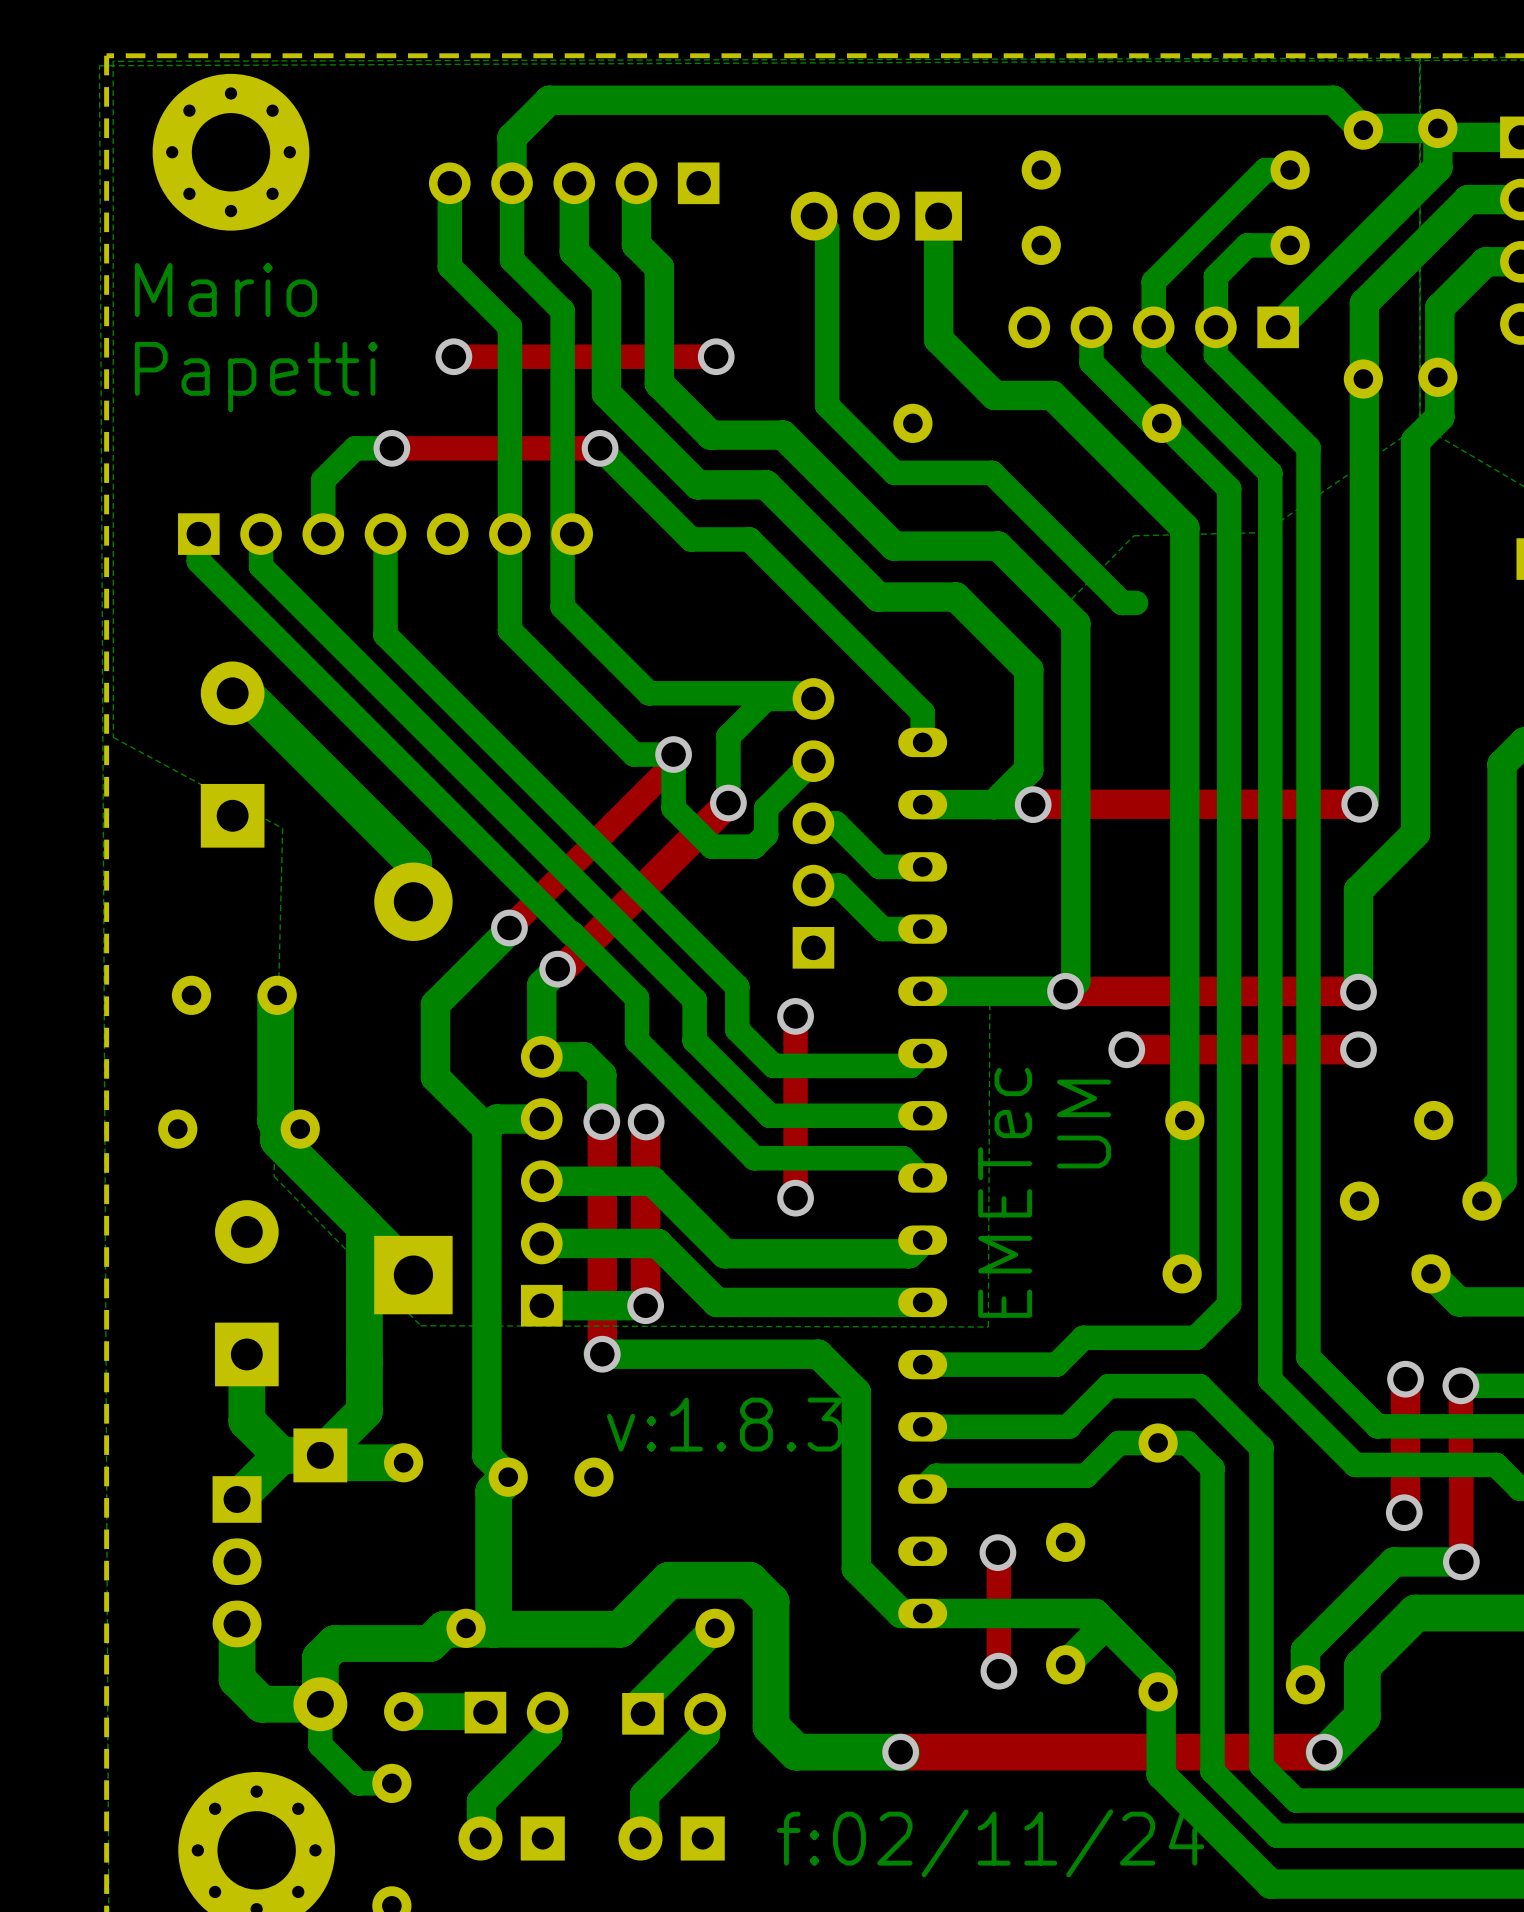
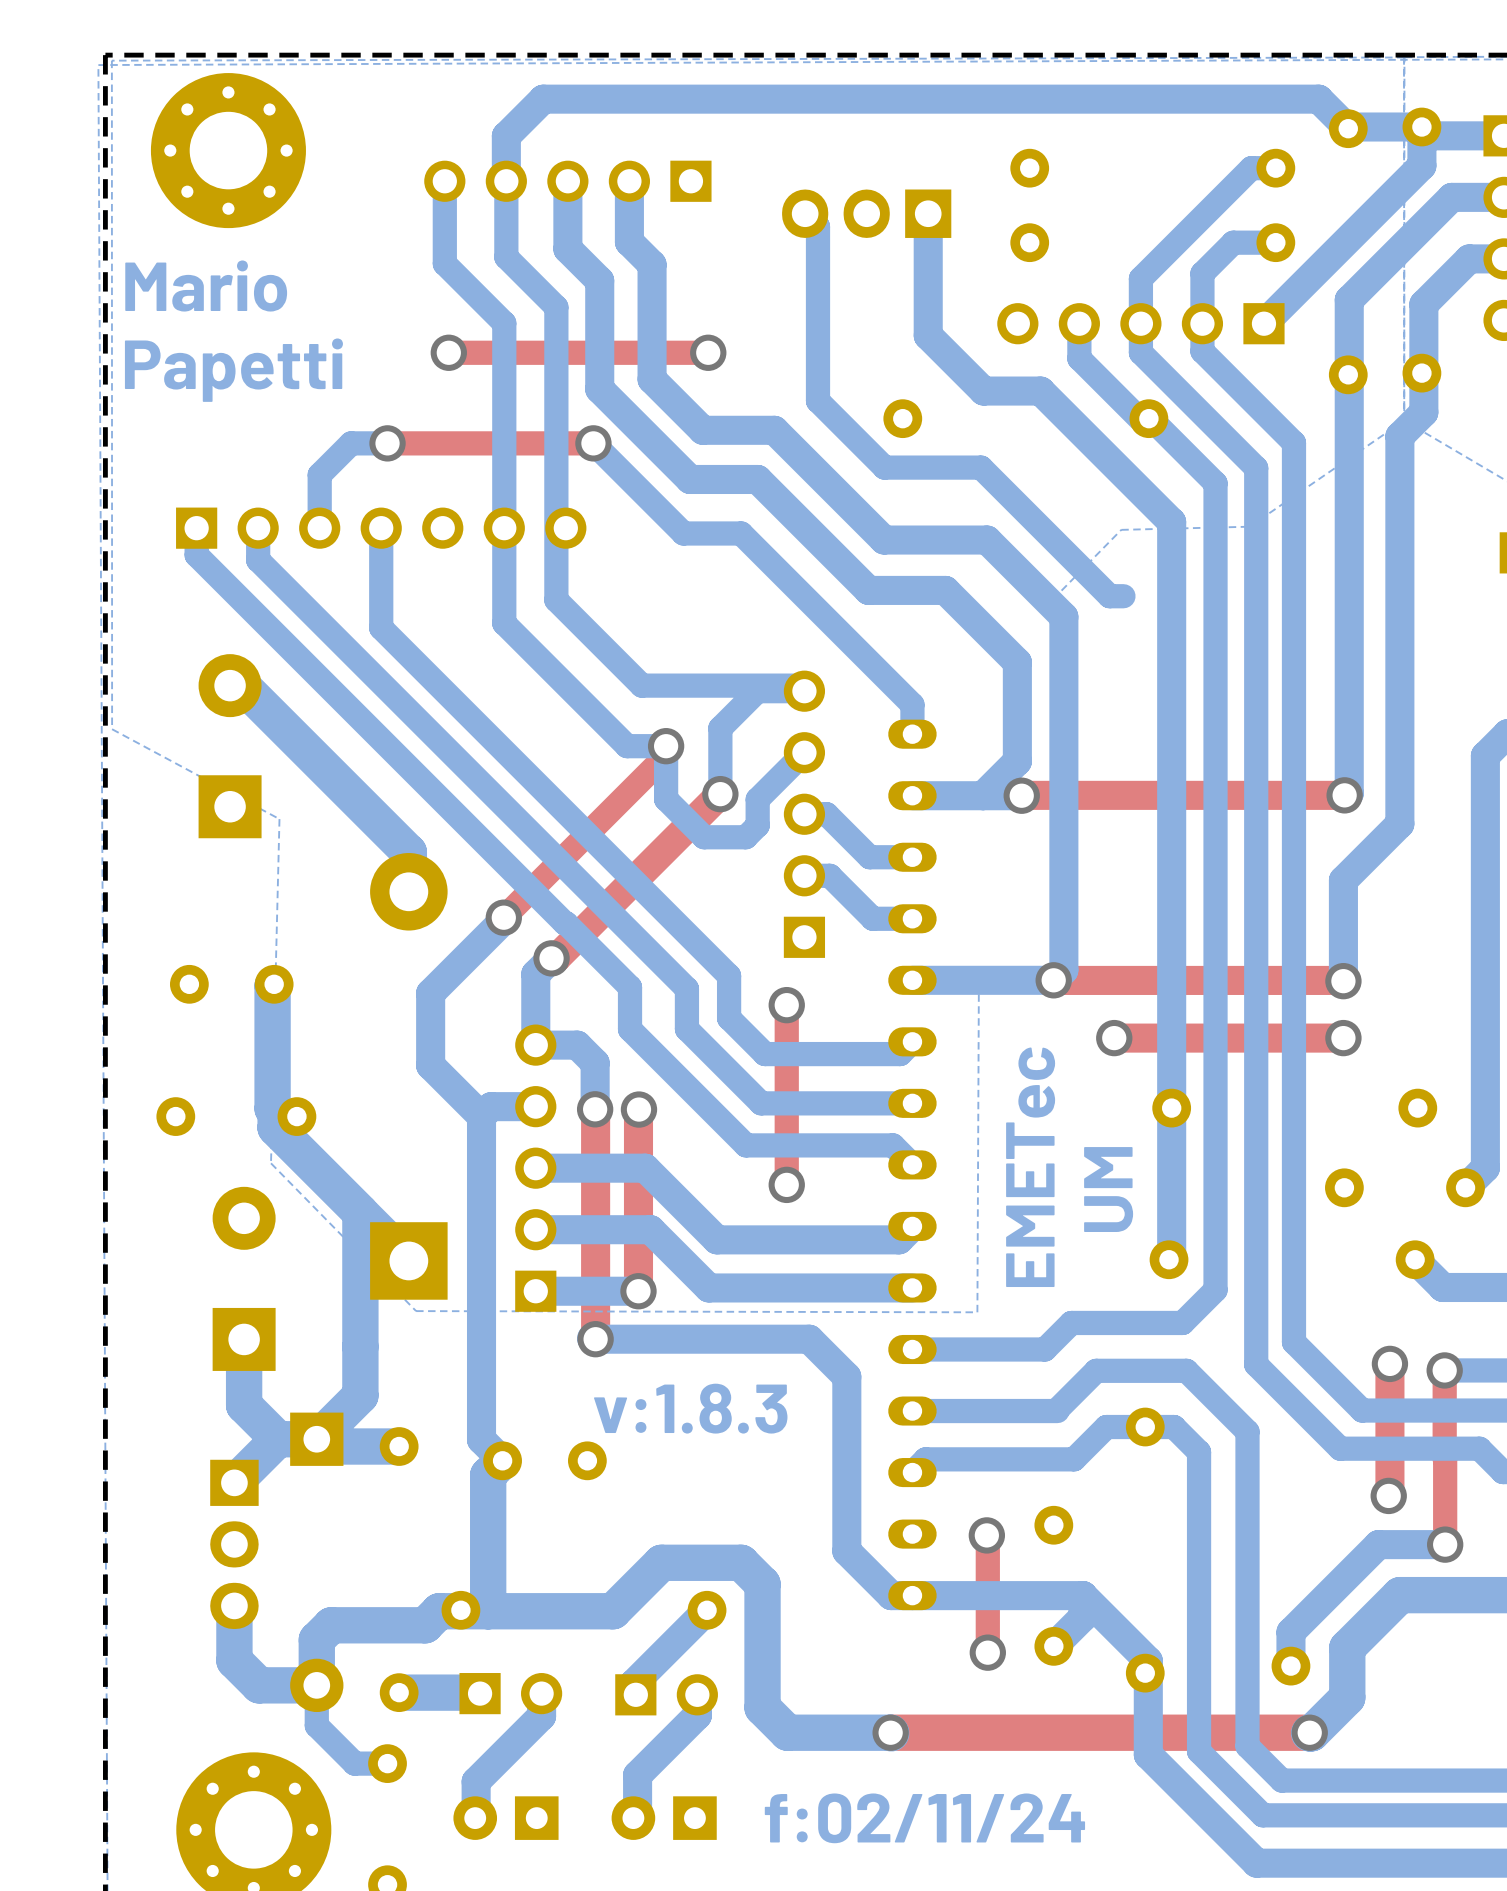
text position: UM (1084, 1124) -> UM (1108, 1189)
text position: EMETec (1005, 1192) -> EMETec (1030, 1167)

